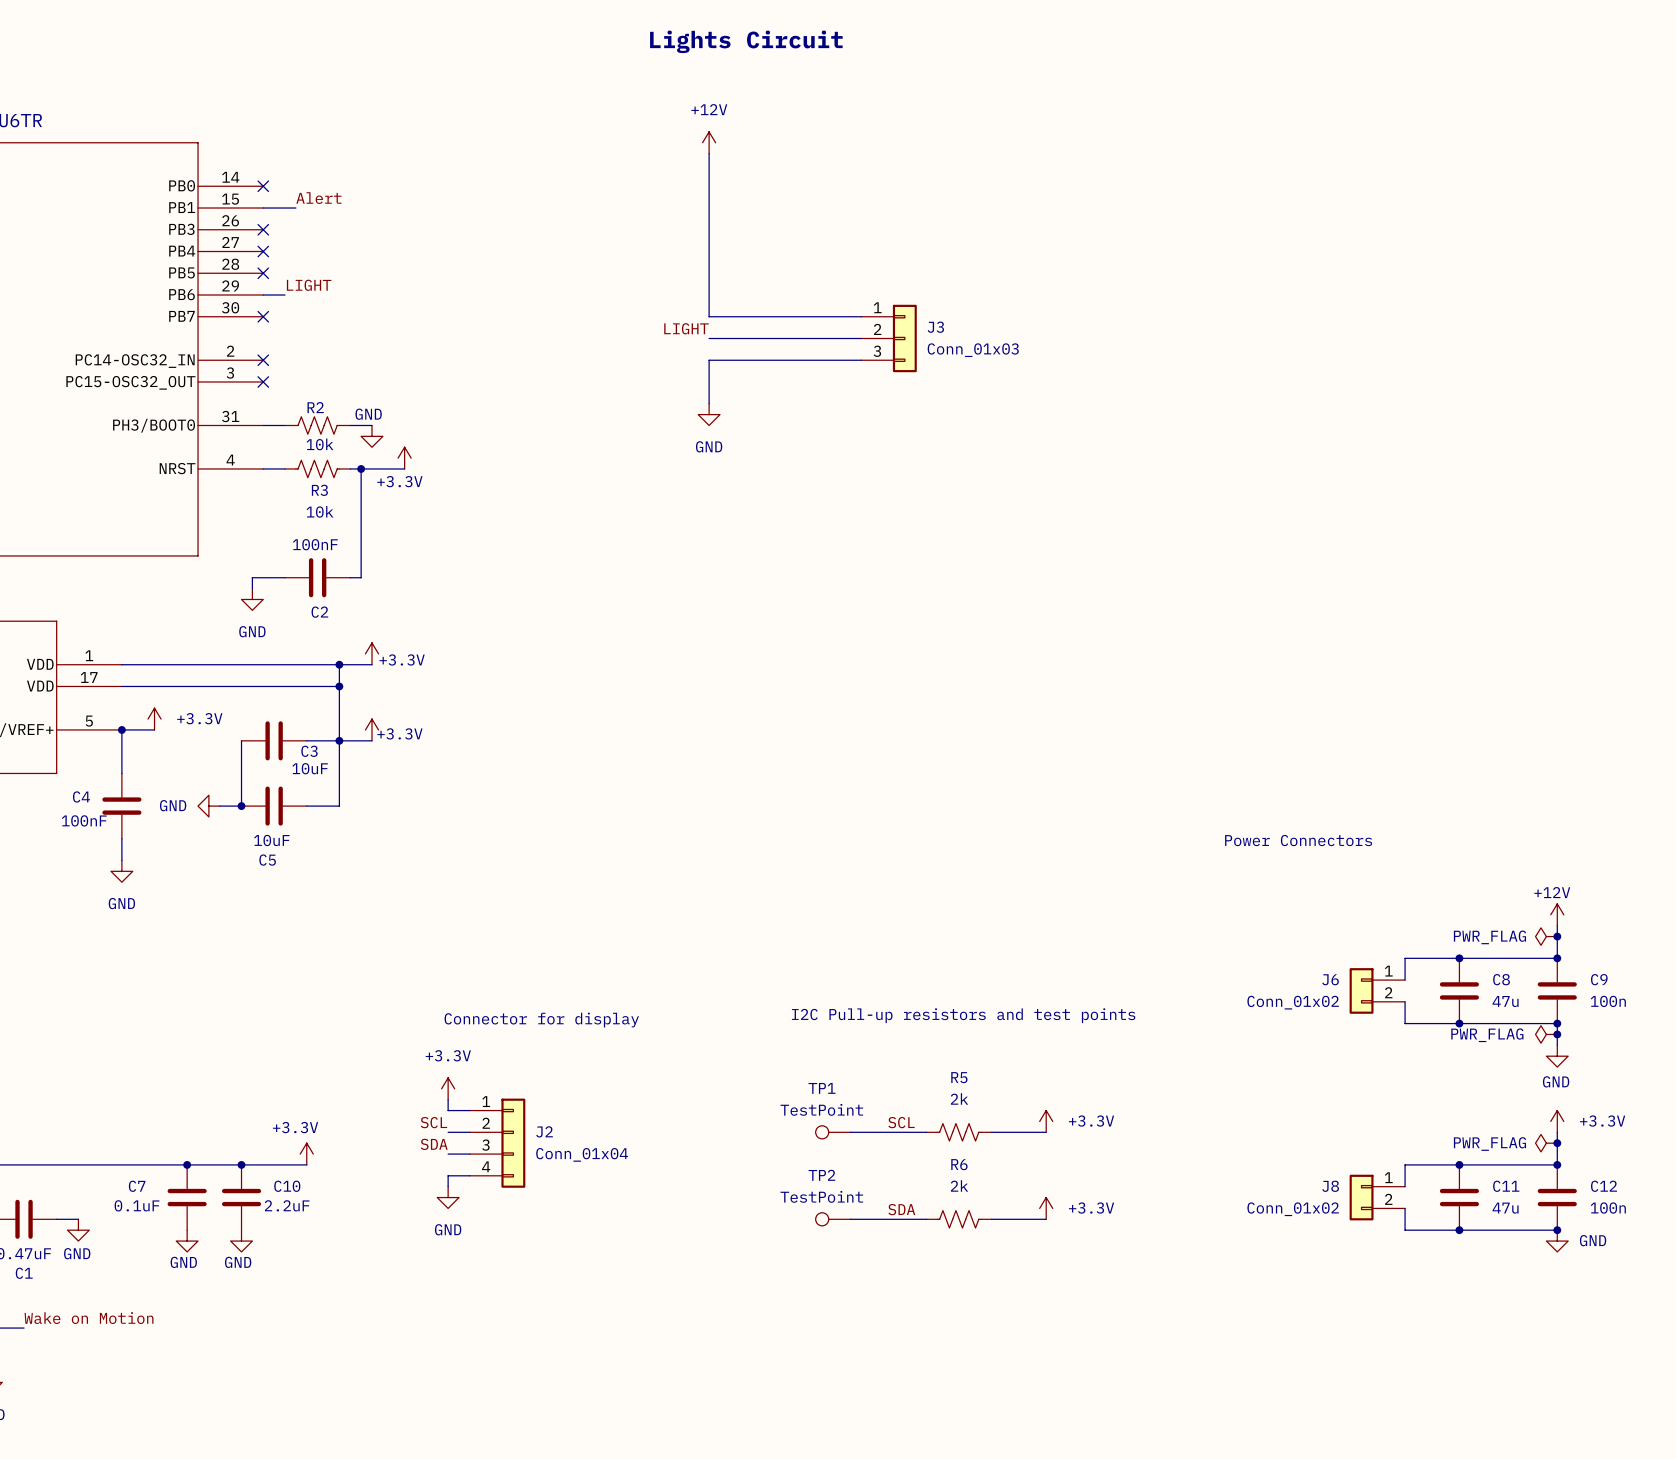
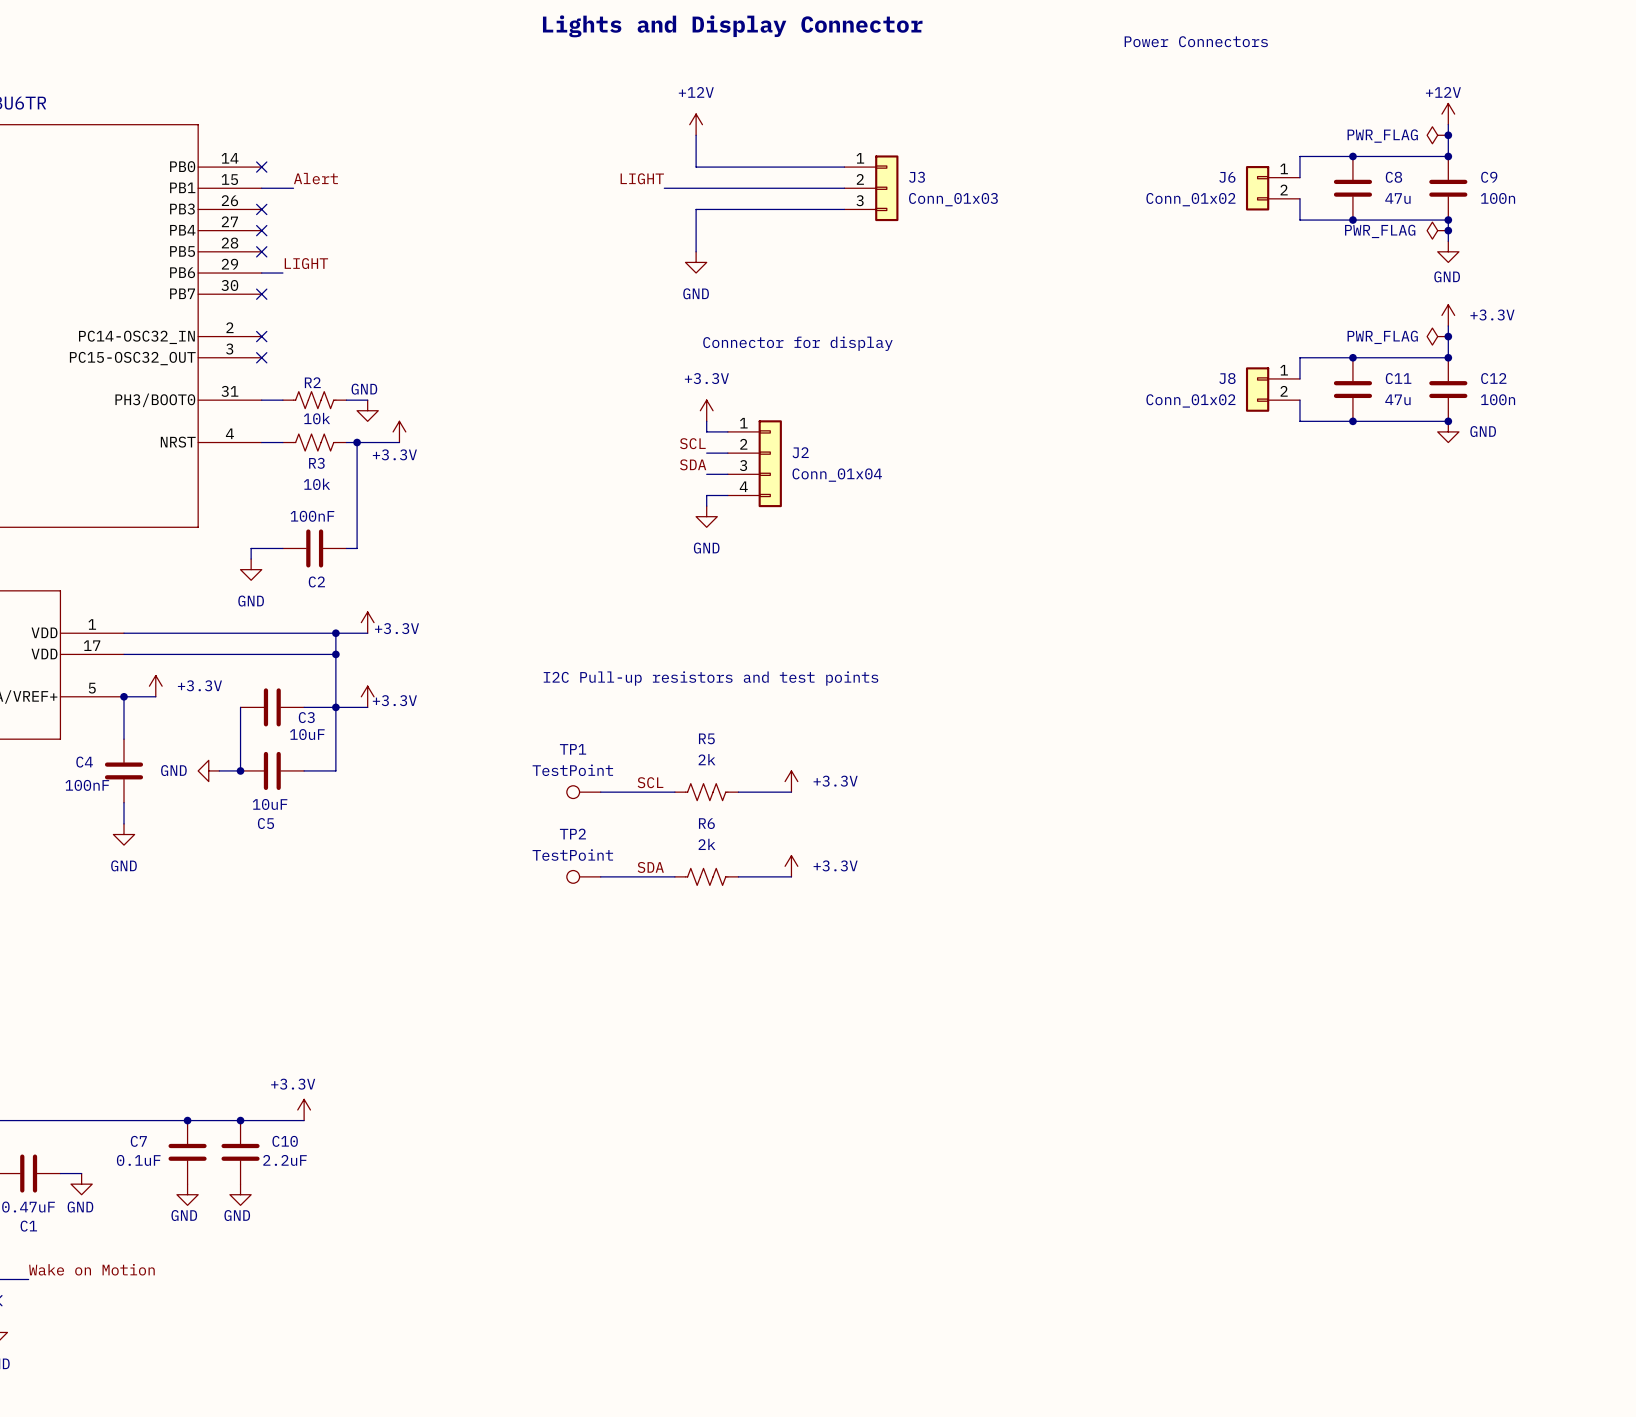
text: Lights Circuit (746, 41) -> Lights and Display Connector (732, 26)
text: none -> Power Connectors (1196, 41)
power symbol: none -> +12V (1448, 114)
wire: none -> (1448, 124) (1448, 156) (1299, 156) (1299, 177)
power symbol: none -> PWR_FLAG (1437, 135)
junction: none -> (1448, 135)
junction: none -> (1352, 156)
junction: none -> (1448, 156)
wire: (709, 186) (709, 229) -> (696, 167) (844, 167)
wire: none -> (664, 188) (844, 188)
wire: none -> (1299, 198) (1299, 220) (1448, 220) (1448, 241)
junction: none -> (1352, 220)
junction: none -> (1448, 220)
power symbol: none -> PWR_FLAG (1437, 230)
junction: none -> (1448, 230)
wire: (709, 273) (709, 316) (861, 316) -> none
power symbol: none -> GND (1448, 251)
power symbol: none -> GND (696, 262)
label position: LIGHT (686, 328) -> LIGHT (642, 178)
wire: (709, 338) (861, 338) -> (696, 209) (844, 209)
J3 position: (889, 338) -> (871, 188)
power symbol: none -> +3.3V (1448, 315)
wire: none -> (1448, 325) (1448, 357) (1299, 357) (1299, 378)
wire: (861, 360) (709, 360) (709, 403) -> none
power symbol: none -> PWR_FLAG (1437, 336)
junction: none -> (1448, 336)
text: none -> Connector for display (797, 343)
junction: none -> (1352, 357)
junction: none -> (1448, 357)
power symbol: GND (709, 414) -> none
wire: none -> (1299, 400) (1299, 421) (1448, 421)
power symbol: none -> +3.3V (706, 410)
wire: none -> (706, 421) (706, 431) (727, 431)
junction: none -> (1352, 421)
junction: none -> (1448, 421)
power symbol: none -> GND (1448, 431)
label: none -> SCL (692, 443)
wire: none -> (706, 453) (727, 453)
label: none -> SDA (693, 464)
wire: none -> (706, 474) (727, 474)
wire: none -> (727, 495) (706, 495) (706, 506)
power symbol: none -> GND (706, 516)
text: none -> I2C Pull-up resistors and test points (710, 678)
power symbol: none -> +3.3V (791, 781)
label: none -> SCL (650, 782)
wire: none -> (600, 792) (674, 792)
wire: none -> (738, 792) (791, 792)
text: Power Connectors (1298, 840) -> none
power symbol: none -> +3.3V (791, 866)
label: none -> SDA (650, 867)
wire: none -> (600, 876) (674, 876)
wire: none -> (738, 876) (791, 876)
power symbol: +12V (1557, 914) -> none
wire: (1557, 925) (1557, 958) (1405, 958) (1405, 980) -> none
power symbol: PWR_FLAG (1546, 936) -> none
junction: (1557, 936) -> none
junction: (1459, 958) -> none
junction: (1557, 958) -> none
J6 position: (1377, 990) -> (1272, 188)
C8 position: (1459, 990) -> (1352, 188)
C9 position: (1557, 990) -> (1448, 188)
wire: (1405, 1001) (1405, 1023) (1557, 1023) (1557, 1045) -> none
text: I2C Pull-up resistors and test points (963, 1015) -> none
text: Connector for display (541, 1020) -> none
junction: (1459, 1023) -> none
junction: (1557, 1023) -> none
power symbol: PWR_FLAG (1546, 1034) -> none
junction: (1557, 1034) -> none
power symbol: GND (1557, 1056) -> none
power symbol: +3.3V (448, 1088) -> none
wire: (448, 1099) (448, 1110) (469, 1110) -> none
power symbol: +3.3V (1046, 1121) -> none
power symbol: +3.3V (1557, 1121) -> none
label: SCL (433, 1122) -> none
label: SCL (901, 1122) -> none
wire: (448, 1132) (469, 1132) -> none
TP1 position: (833, 1132) -> (583, 792)
wire: (850, 1132) (926, 1132) -> none
R5 position: (959, 1132) -> (706, 792)
wire: (991, 1132) (1046, 1132) -> none
wire: (1557, 1132) (1557, 1164) (1405, 1164) (1405, 1186) -> none
J2 position: (497, 1143) -> (754, 463)
power symbol: PWR_FLAG (1546, 1143) -> none
junction: (1557, 1143) -> none
label: SDA (434, 1144) -> none
wire: (448, 1154) (469, 1154) -> none
junction: (1459, 1164) -> none
junction: (1557, 1164) -> none
wire: (469, 1175) (448, 1175) (448, 1186) -> none
power symbol: GND (448, 1197) -> none
J8 position: (1377, 1197) -> (1272, 389)
C11 position: (1459, 1197) -> (1352, 389)
C12 position: (1557, 1197) -> (1448, 389)
power symbol: +3.3V (1046, 1208) -> none
wire: (1405, 1208) (1405, 1230) (1557, 1230) -> none
label: SDA (901, 1209) -> none
TP2 position: (833, 1219) -> (583, 876)
wire: (850, 1219) (926, 1219) -> none
R6 position: (959, 1219) -> (706, 876)
wire: (991, 1219) (1046, 1219) -> none
junction: (1459, 1230) -> none
junction: (1557, 1230) -> none
power symbol: GND (1557, 1241) -> none

